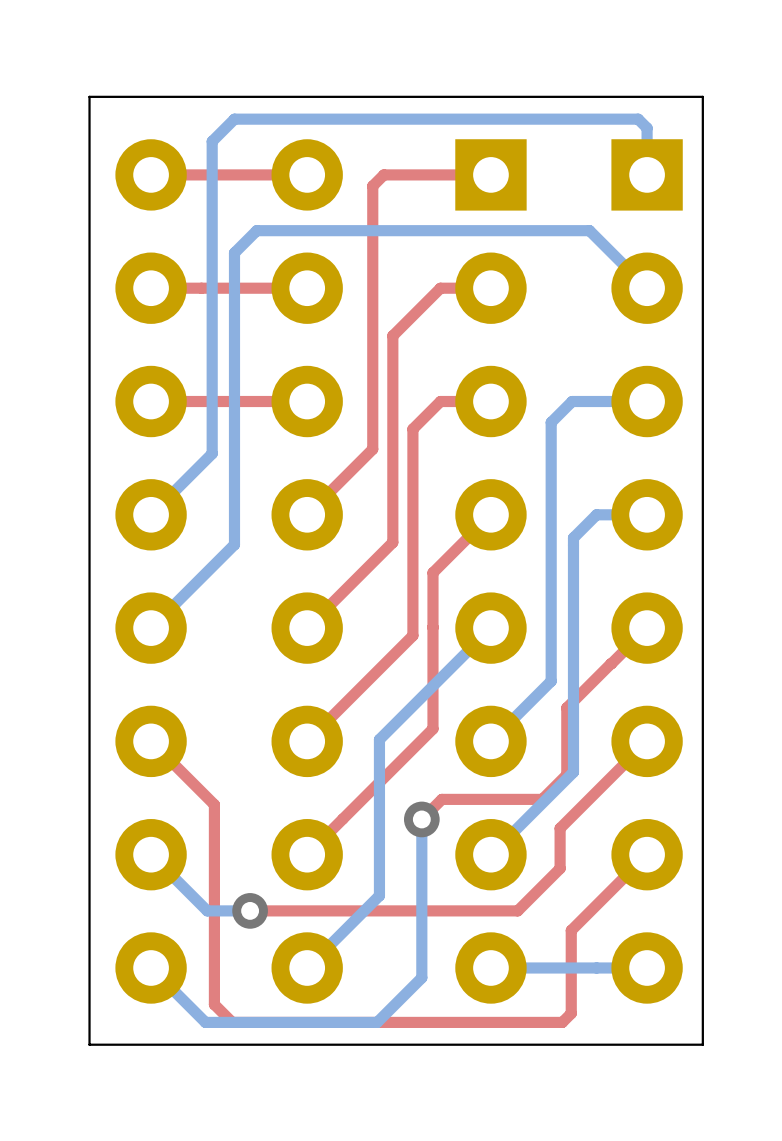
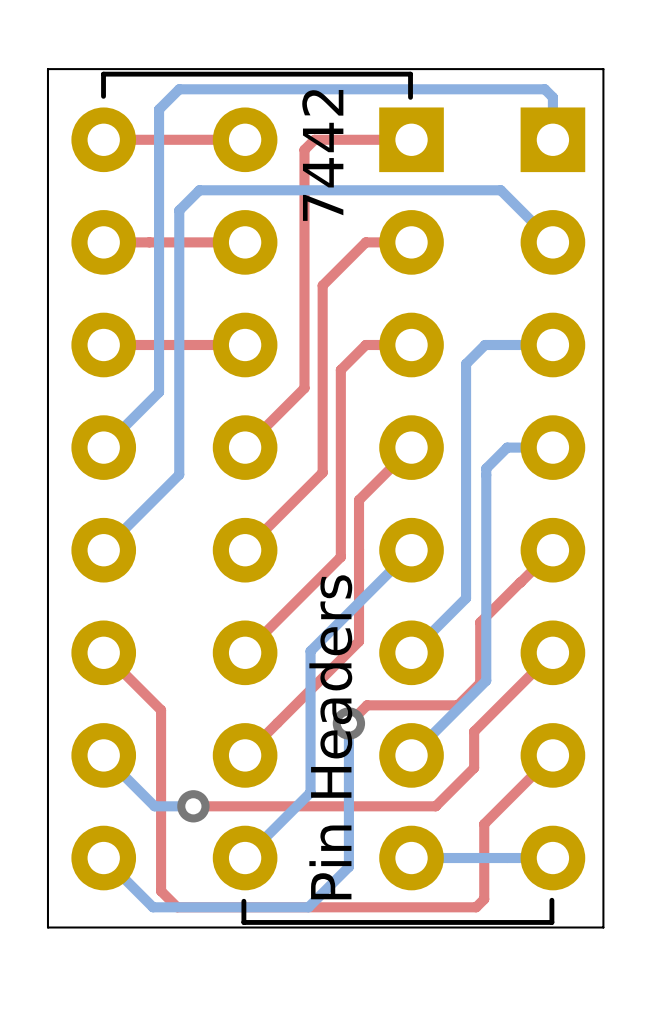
line: none -> (103, 96) (103, 74) (410, 74) (410, 97)
text: none -> 7442 (322, 155)
text: none -> Pin Headers (330, 737)
line: none -> (551, 900) (551, 922) (243, 922) (243, 901)

